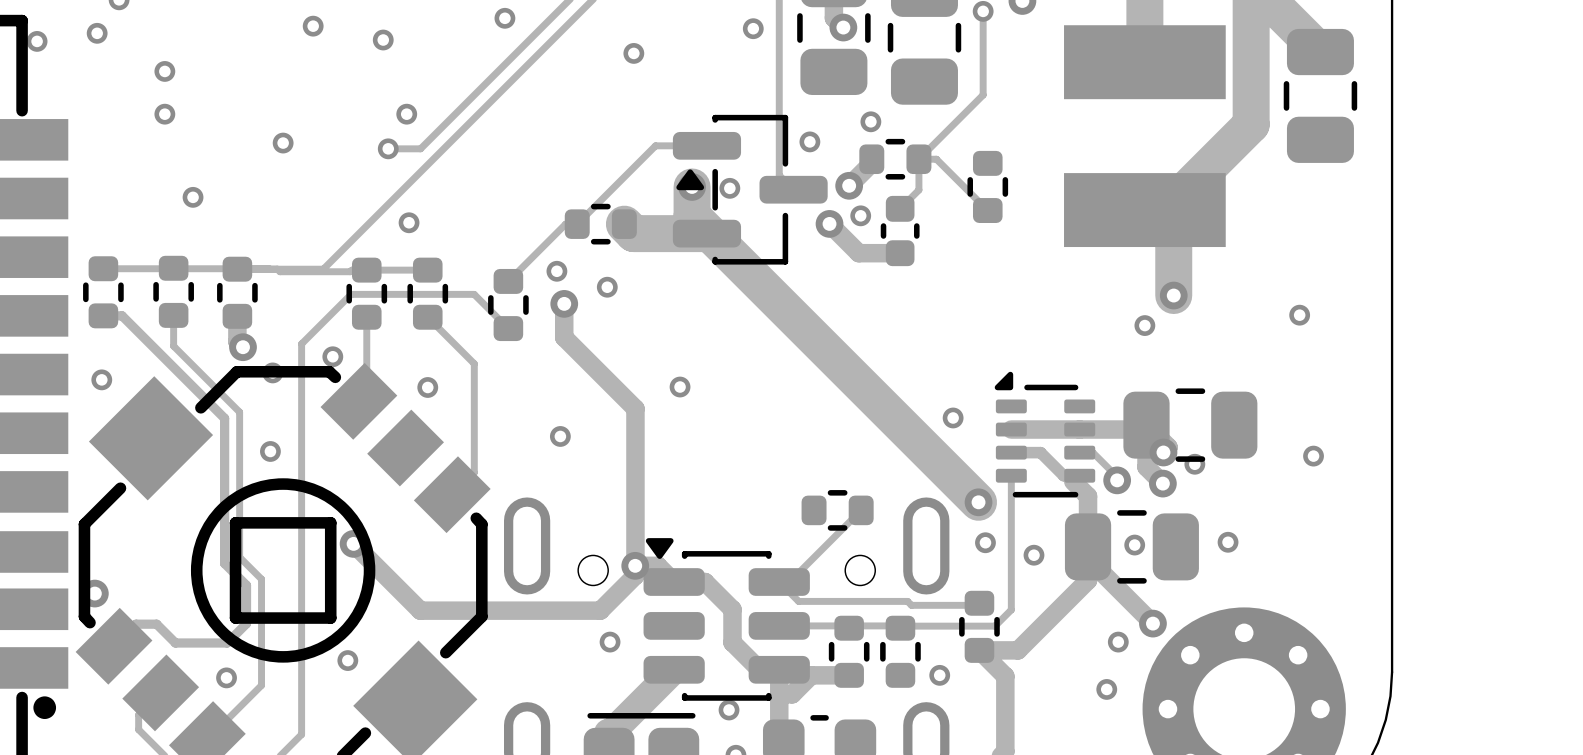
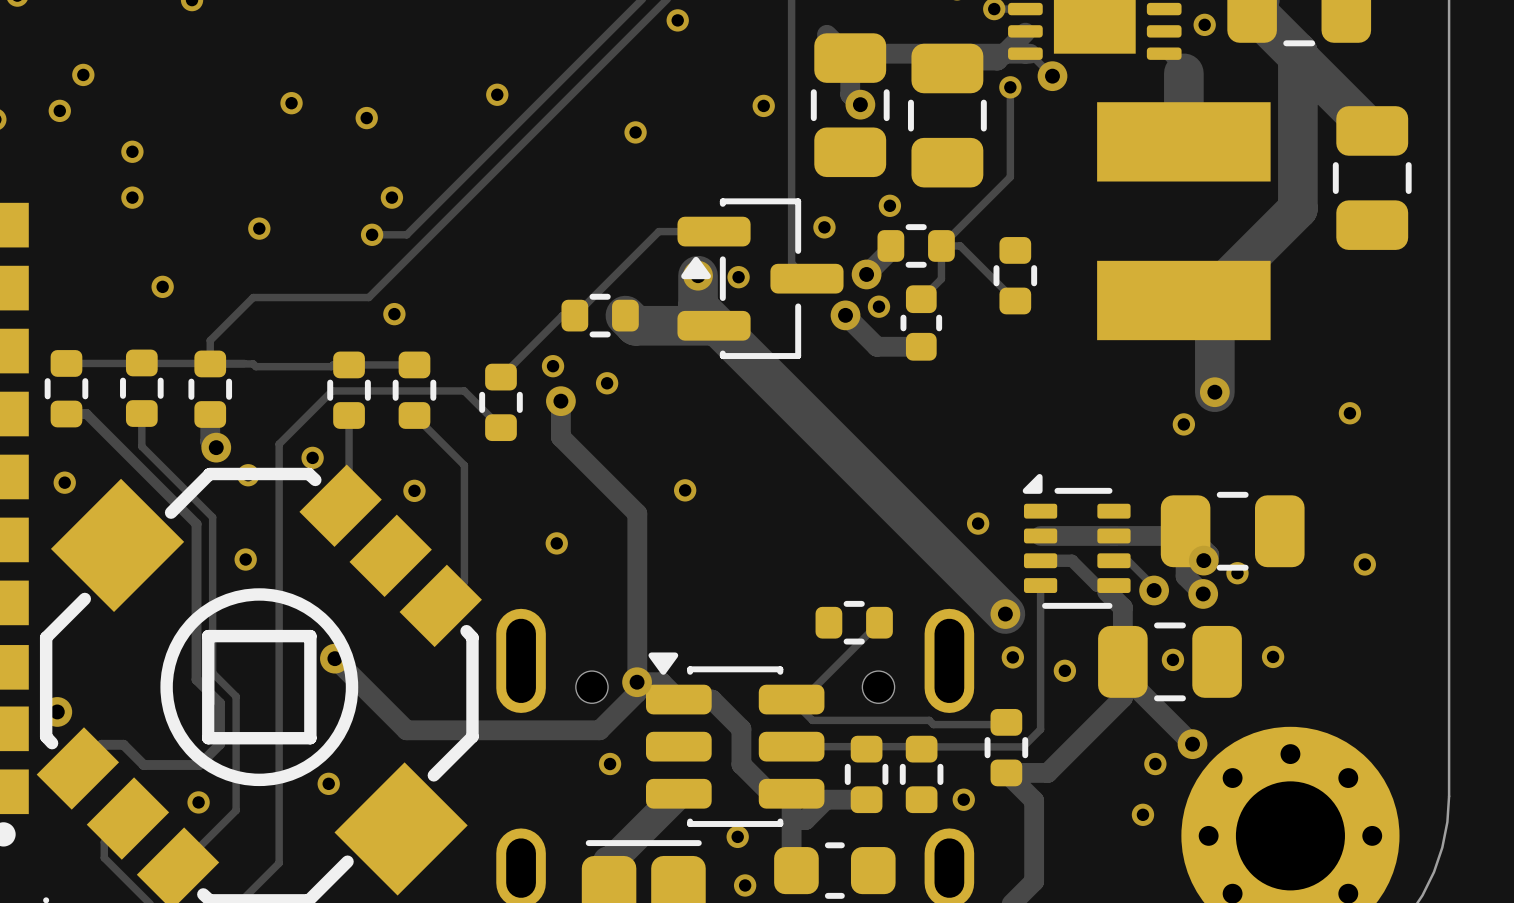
track: (385, 207) (323, 269) (277, 269) -> (368, 297) (253, 297) (210, 340) (210, 363)

